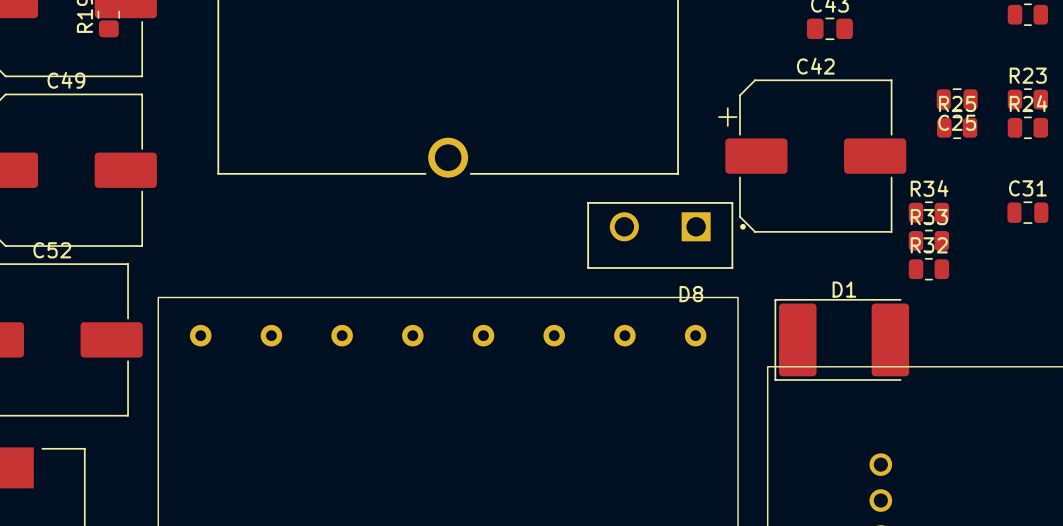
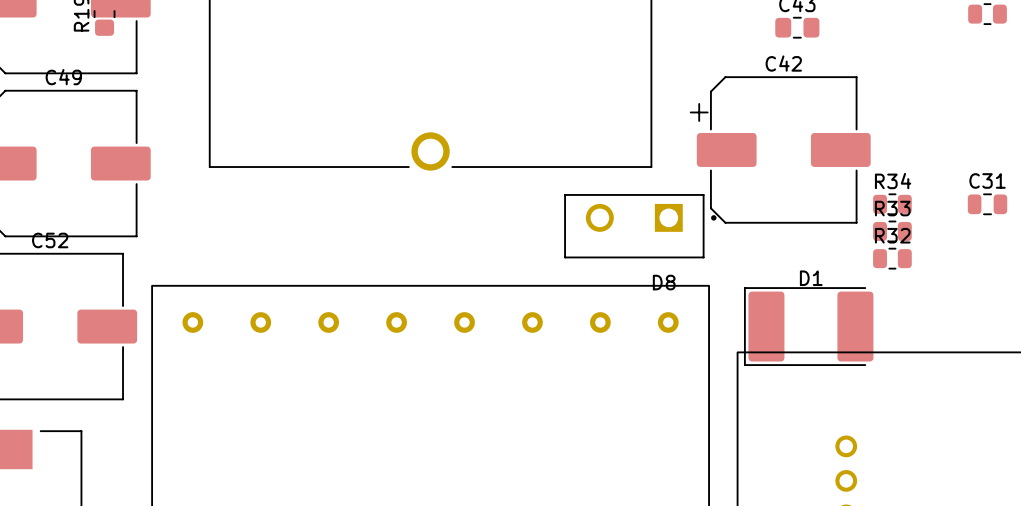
C25: (957, 99) -> none
R23: (1027, 99) -> none
R25: (957, 127) -> none
R24: (1027, 127) -> none

